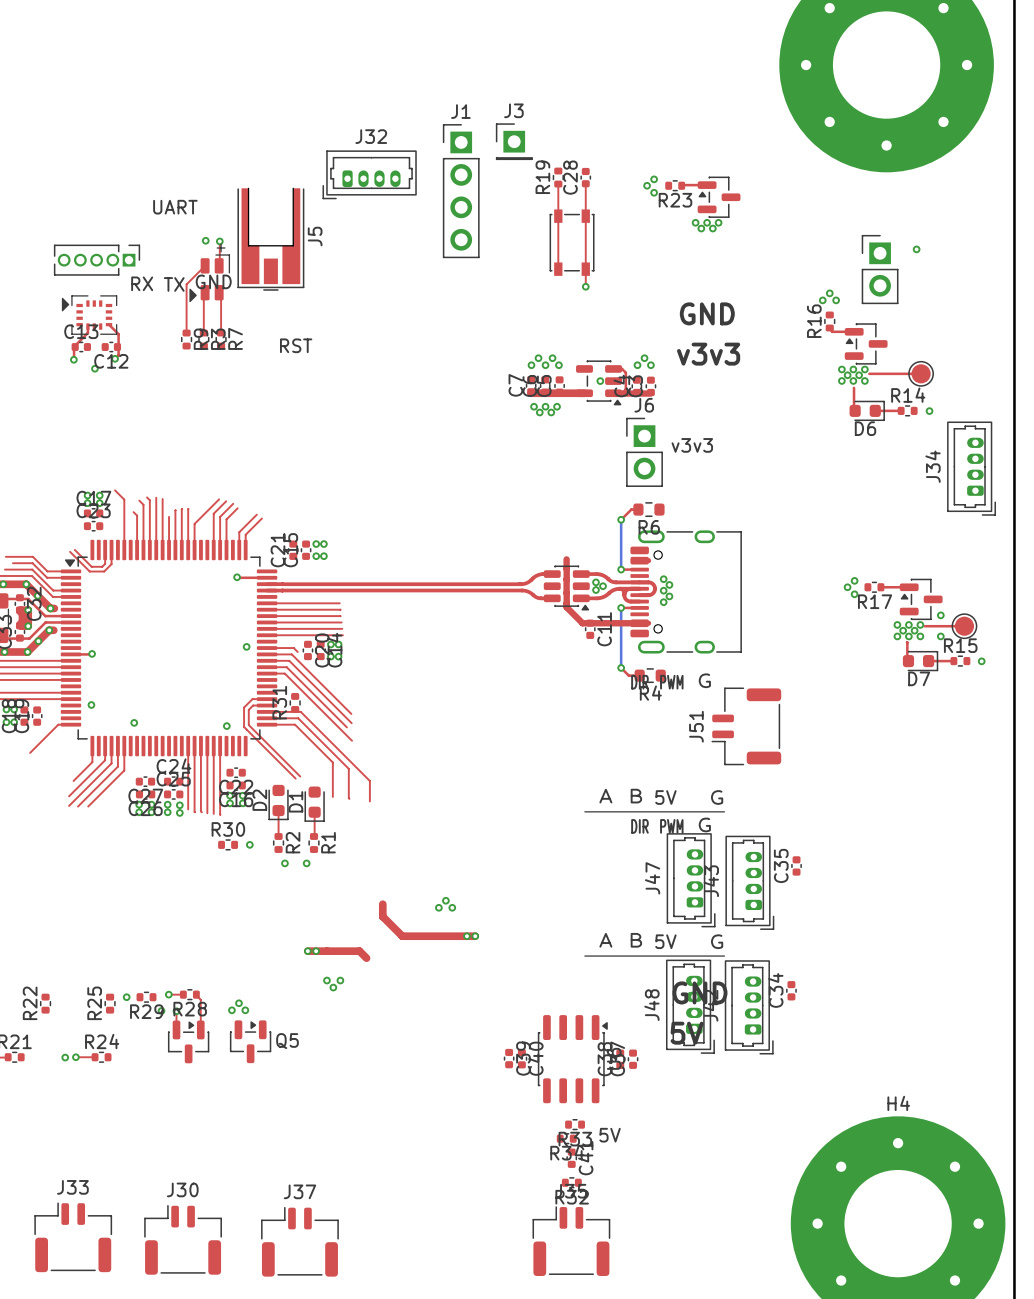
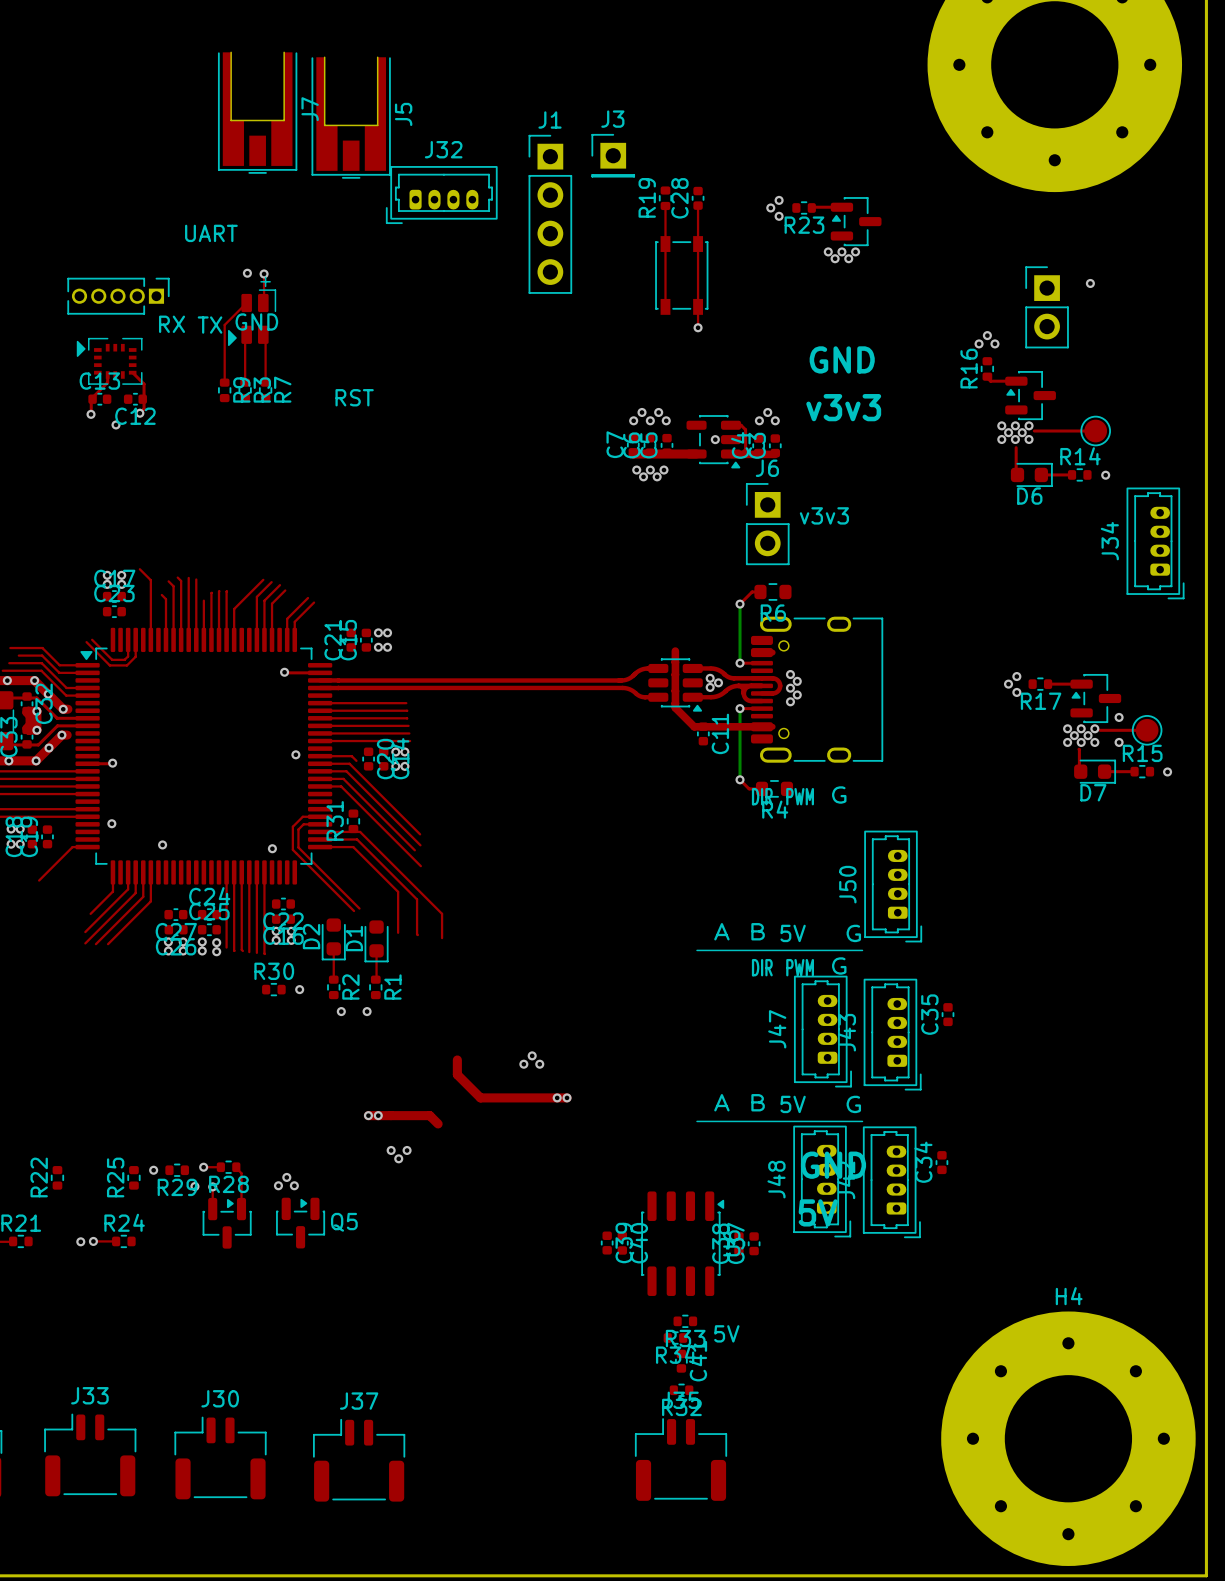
J7: none -> (257, 112)
J5 position: (270, 239) -> (351, 117)
J51: (746, 726) -> none
J50: none -> (893, 886)

